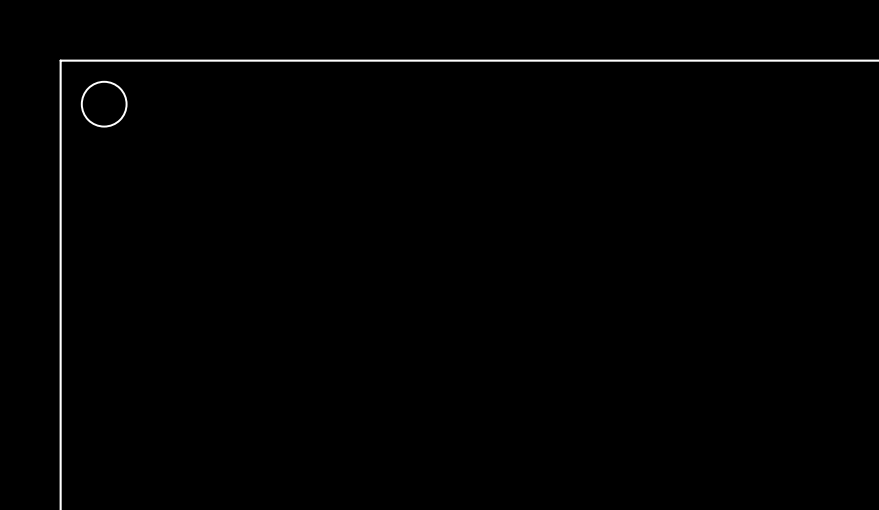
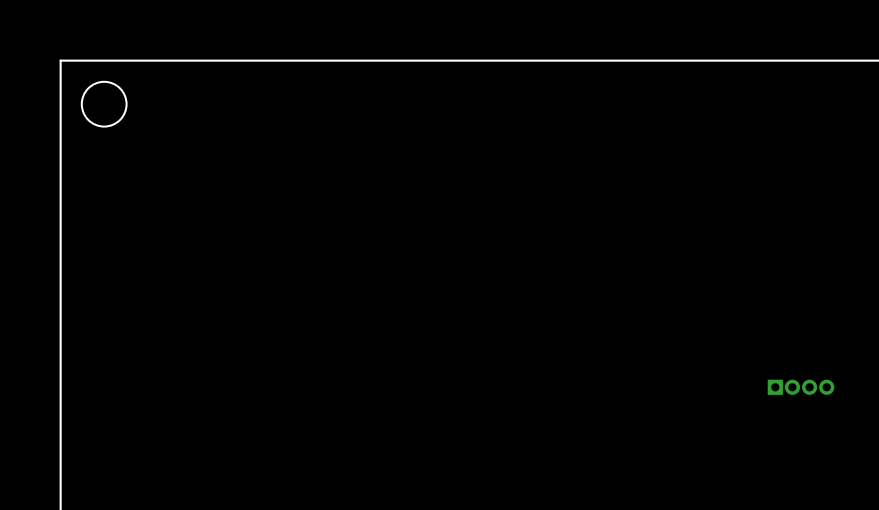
part: none -> (801, 387)

